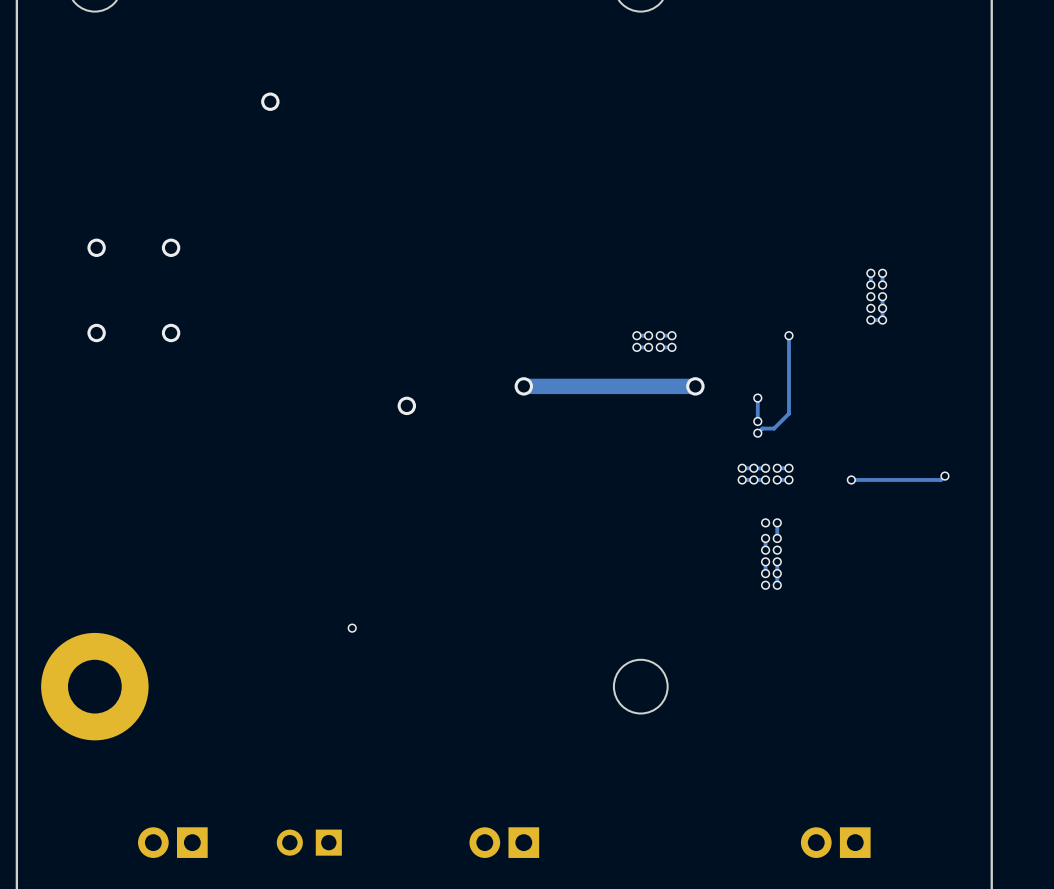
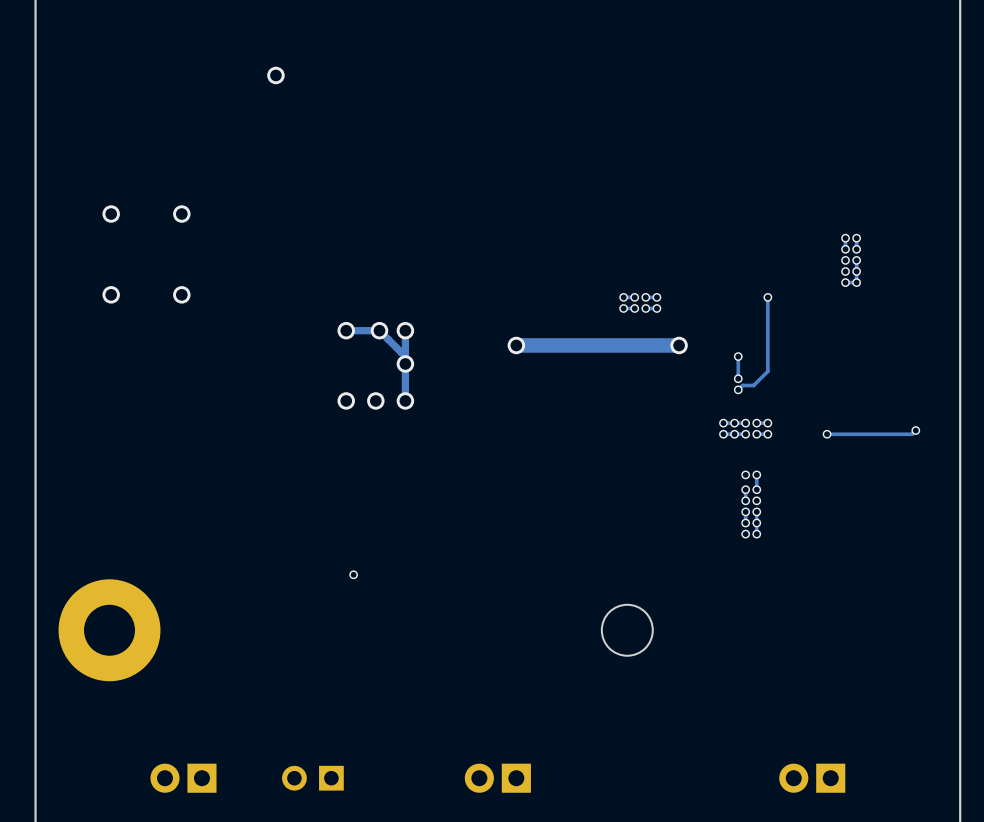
track: none -> (346, 330) (379, 330) (401, 352) (405, 352)
via: none -> (346, 330)
via: none -> (379, 330)
track: none -> (405, 330) (405, 400)
via: none -> (405, 330)
via: none -> (346, 400)
via: none -> (375, 400)
via: none -> (405, 400)

